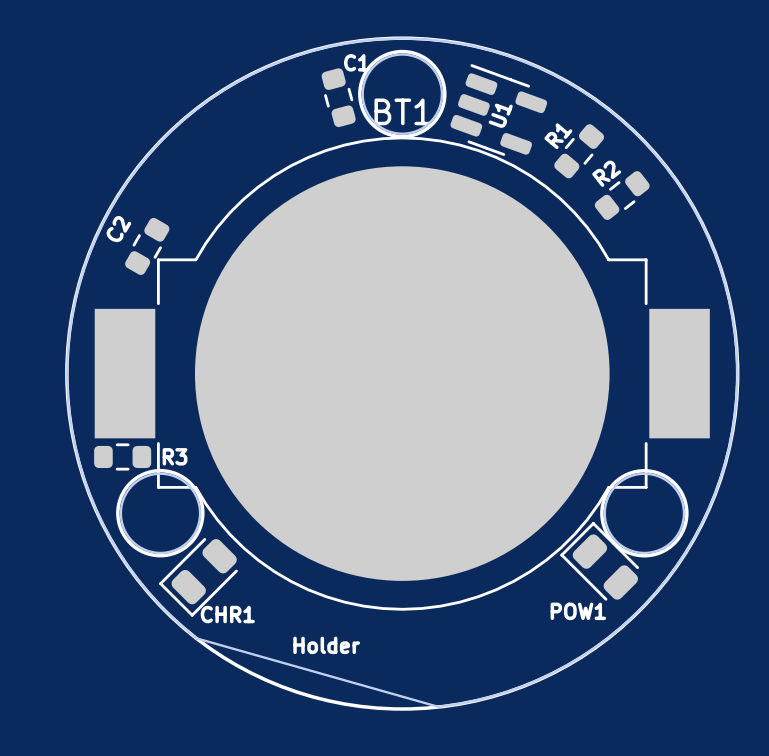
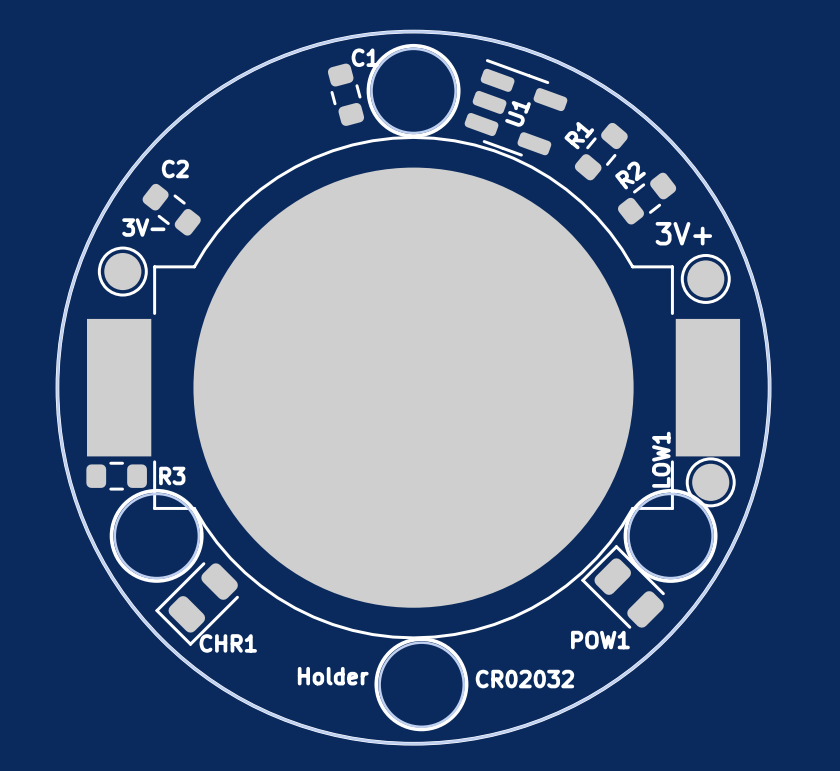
round board edge: none -> [56, 30, 771, 745]
BT1 name: BT1 (402, 111) -> CR02032 (524, 679)
C2 rotation: 0° (147, 246) -> 82° counterclockwise (171, 209)
C2 position: (147, 246) -> (171, 209)
3V-: none -> (122, 271)
3V+: none -> (705, 278)
LOW1: none -> (710, 482)
drawing: none -> [374, 637, 469, 732]
round board edge: none -> [378, 641, 465, 729]
board edge: (196, 638) (438, 706) (483, 698) (506, 692) (548, 675) (588, 652) (607, 638) (642, 607) (657, 590) (685, 553) (696, 533) (716, 491) (723, 469) (733, 424) (736, 401) (737, 378) (734, 332) (726, 287) (719, 265) (701, 222) (690, 202) (664, 164) (649, 146) (615, 115) (597, 100) (557, 76) (537, 66) (493, 51) (448, 41) (425, 39) (402, 38) (356, 41) (333, 45) (289, 58) (267, 66) (226, 88) (189, 114) (155, 146) (140, 164) (126, 182) (103, 222) (93, 243) (78, 287) (73, 309) (67, 355) (68, 401) (75, 447) (81, 469) (88, 491) (107, 533) (119, 553) (146, 590) (162, 607) (196, 638) -> none

